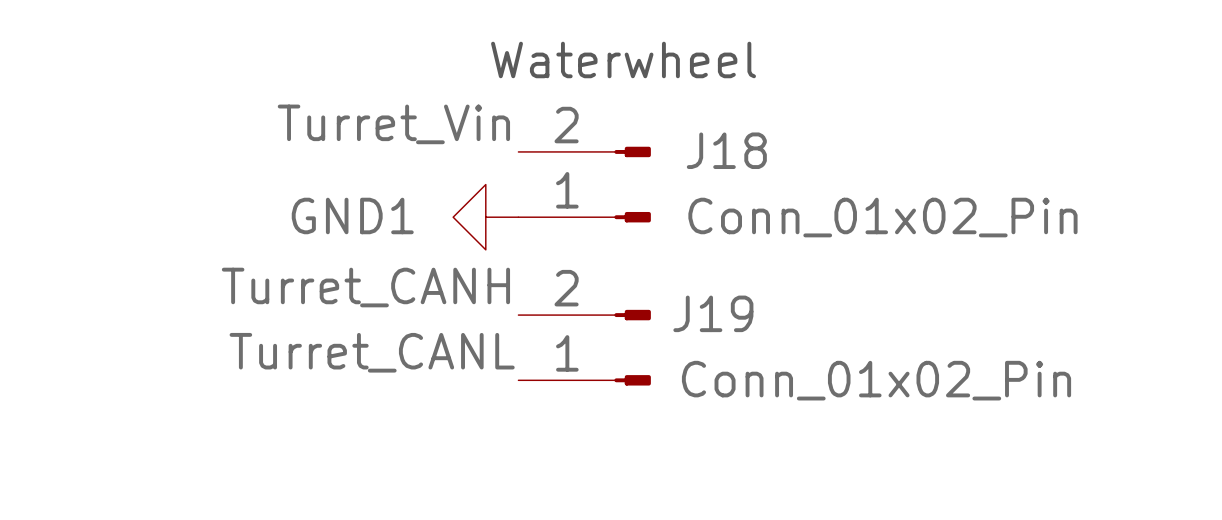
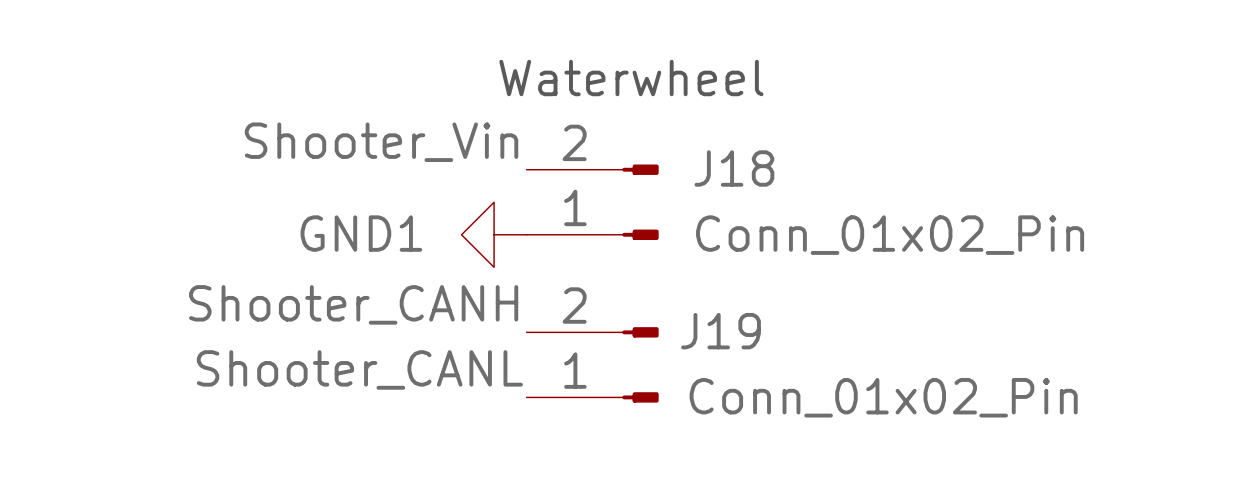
label: Turret_Vin (393, 124) -> Shooter_Vin (381, 142)
label: Turret_CANH (365, 287) -> Shooter_CANH (353, 304)
label: Turret_CANL (372, 352) -> Shooter_CANL (359, 369)

